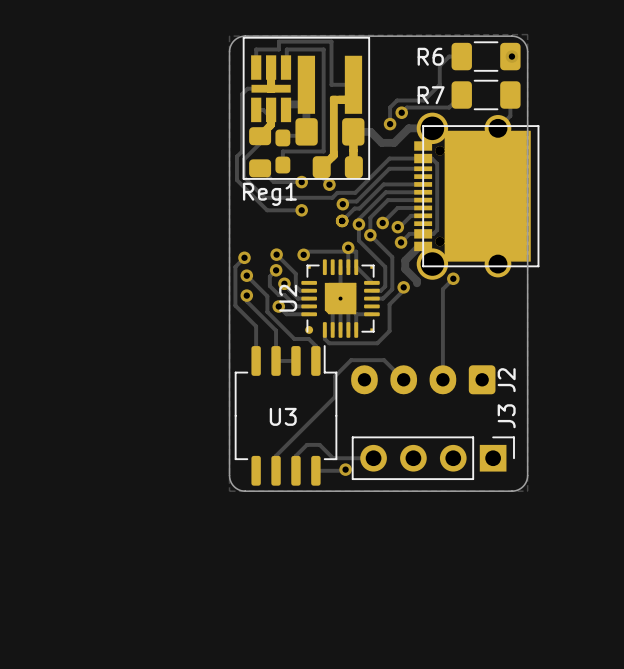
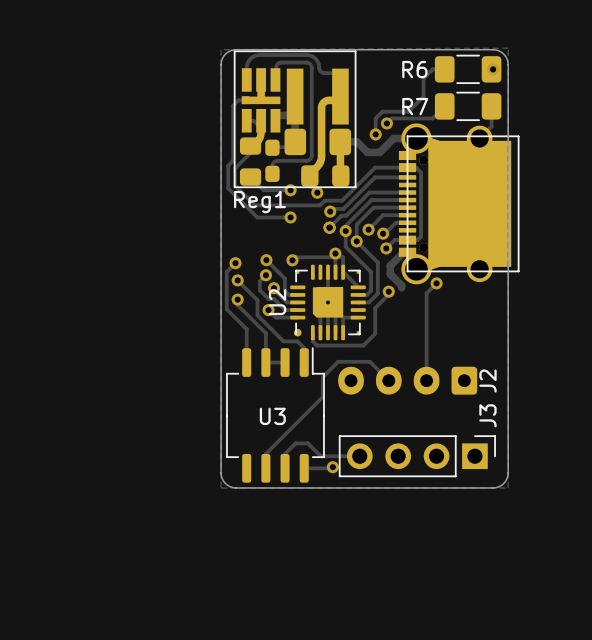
Reg1 footprint: [242, 36, 371, 180] -> [233, 50, 357, 189]
J2 footprint: [414, 112, 540, 280] -> [398, 123, 520, 285]

